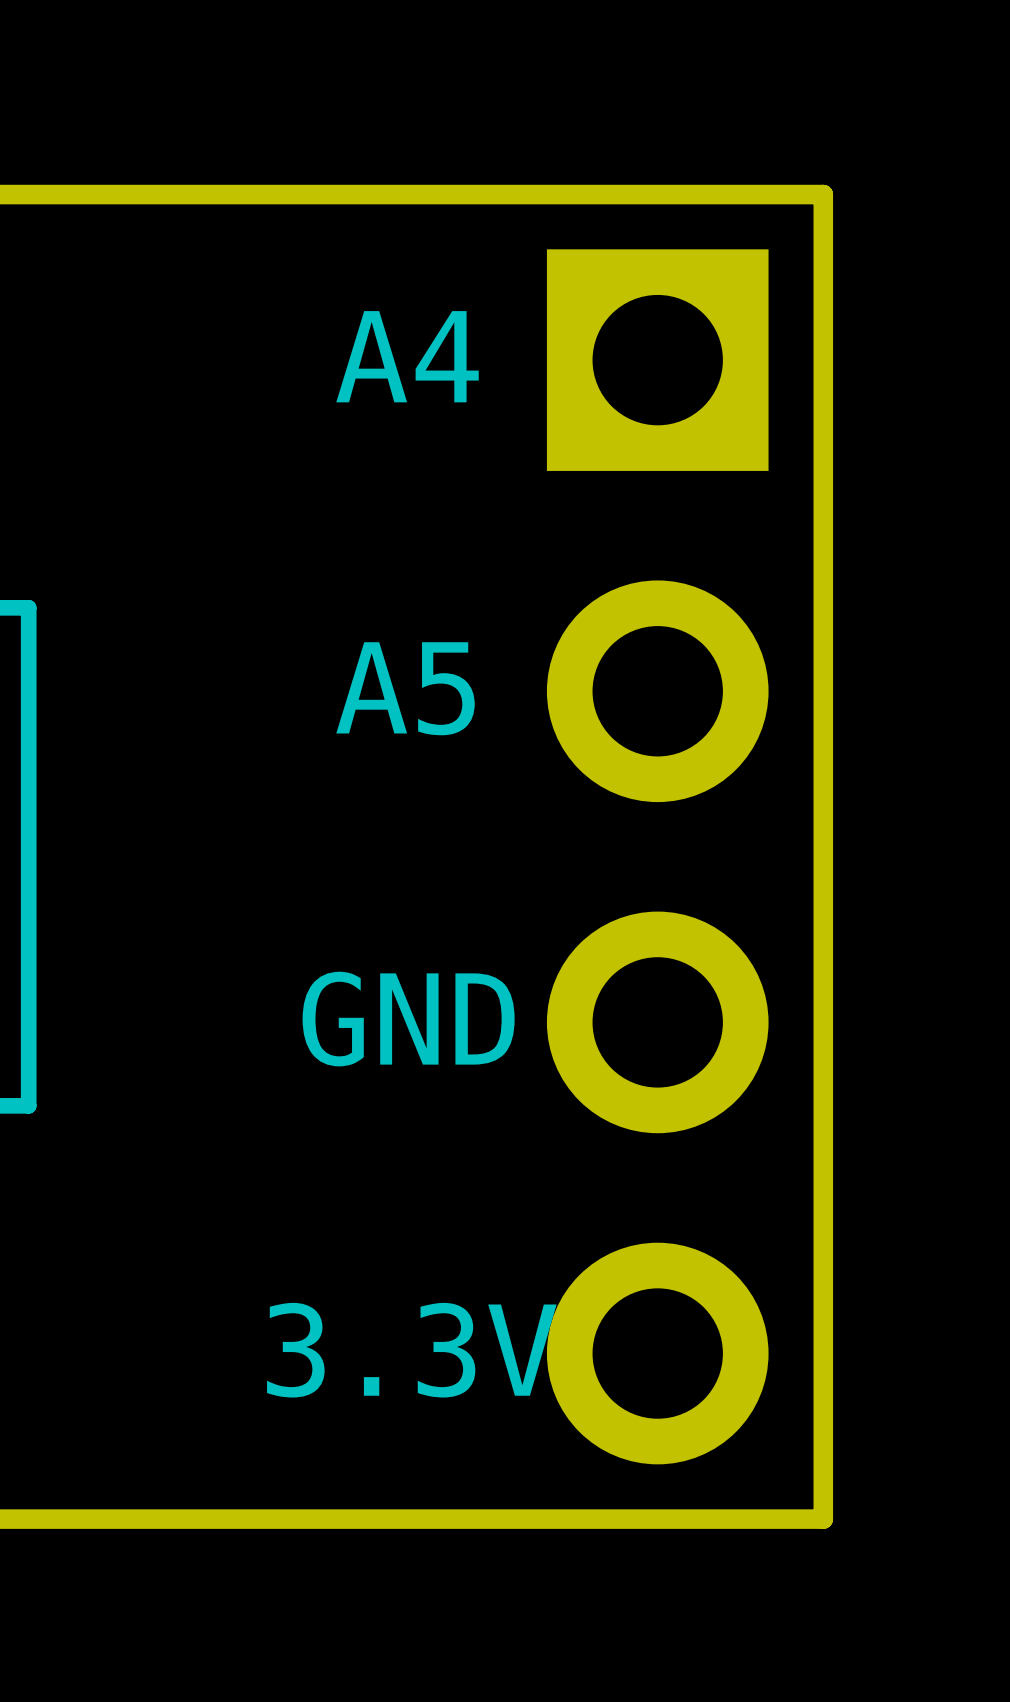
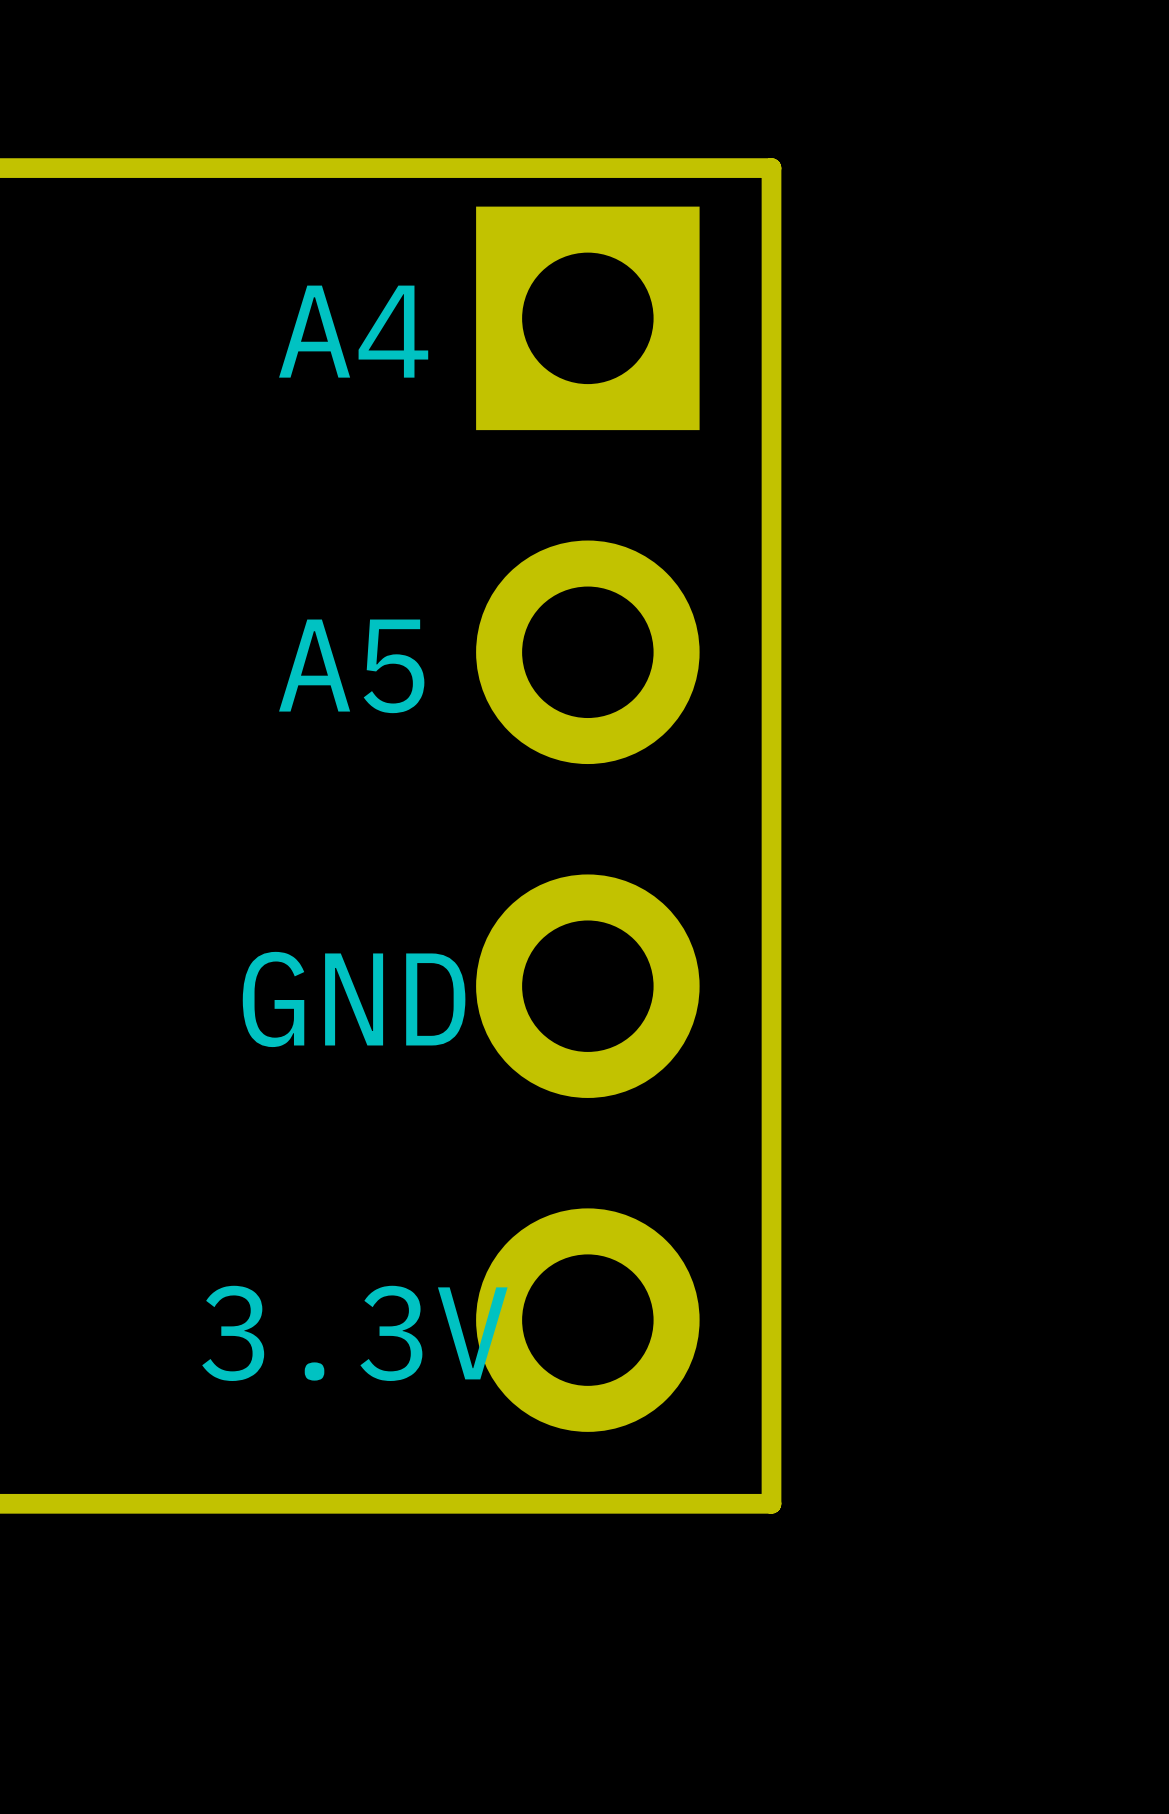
part position: (657, 856) -> (587, 819)

